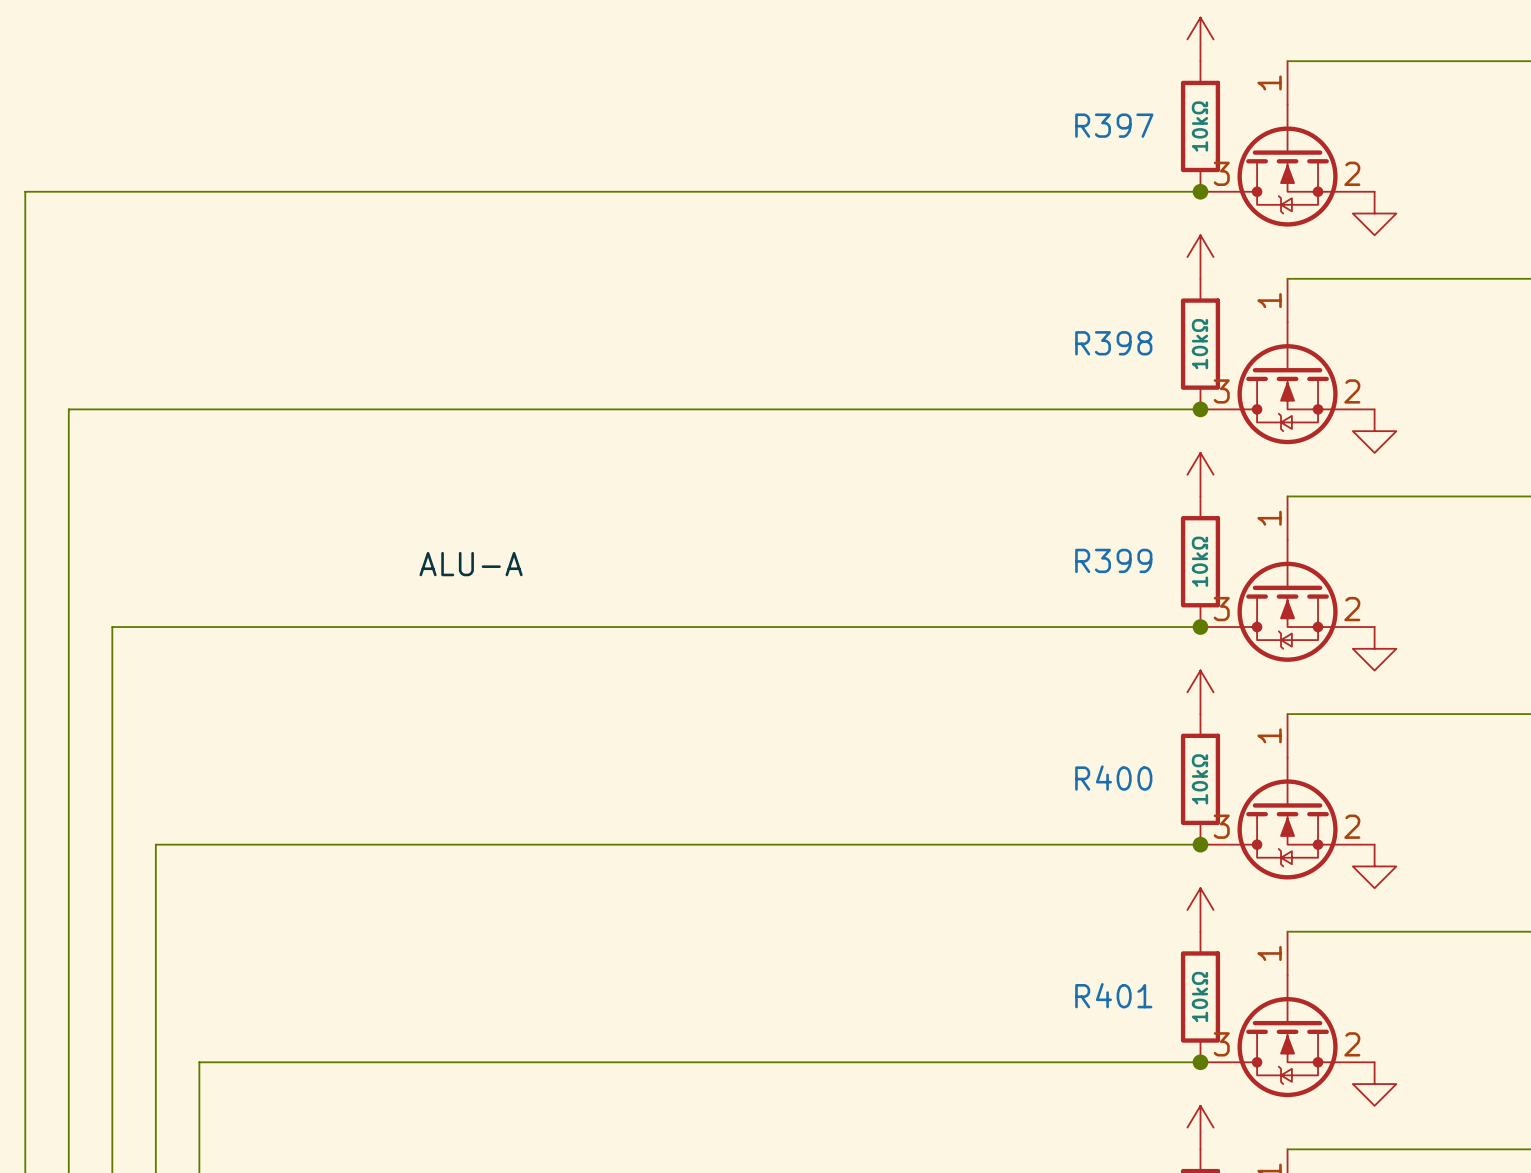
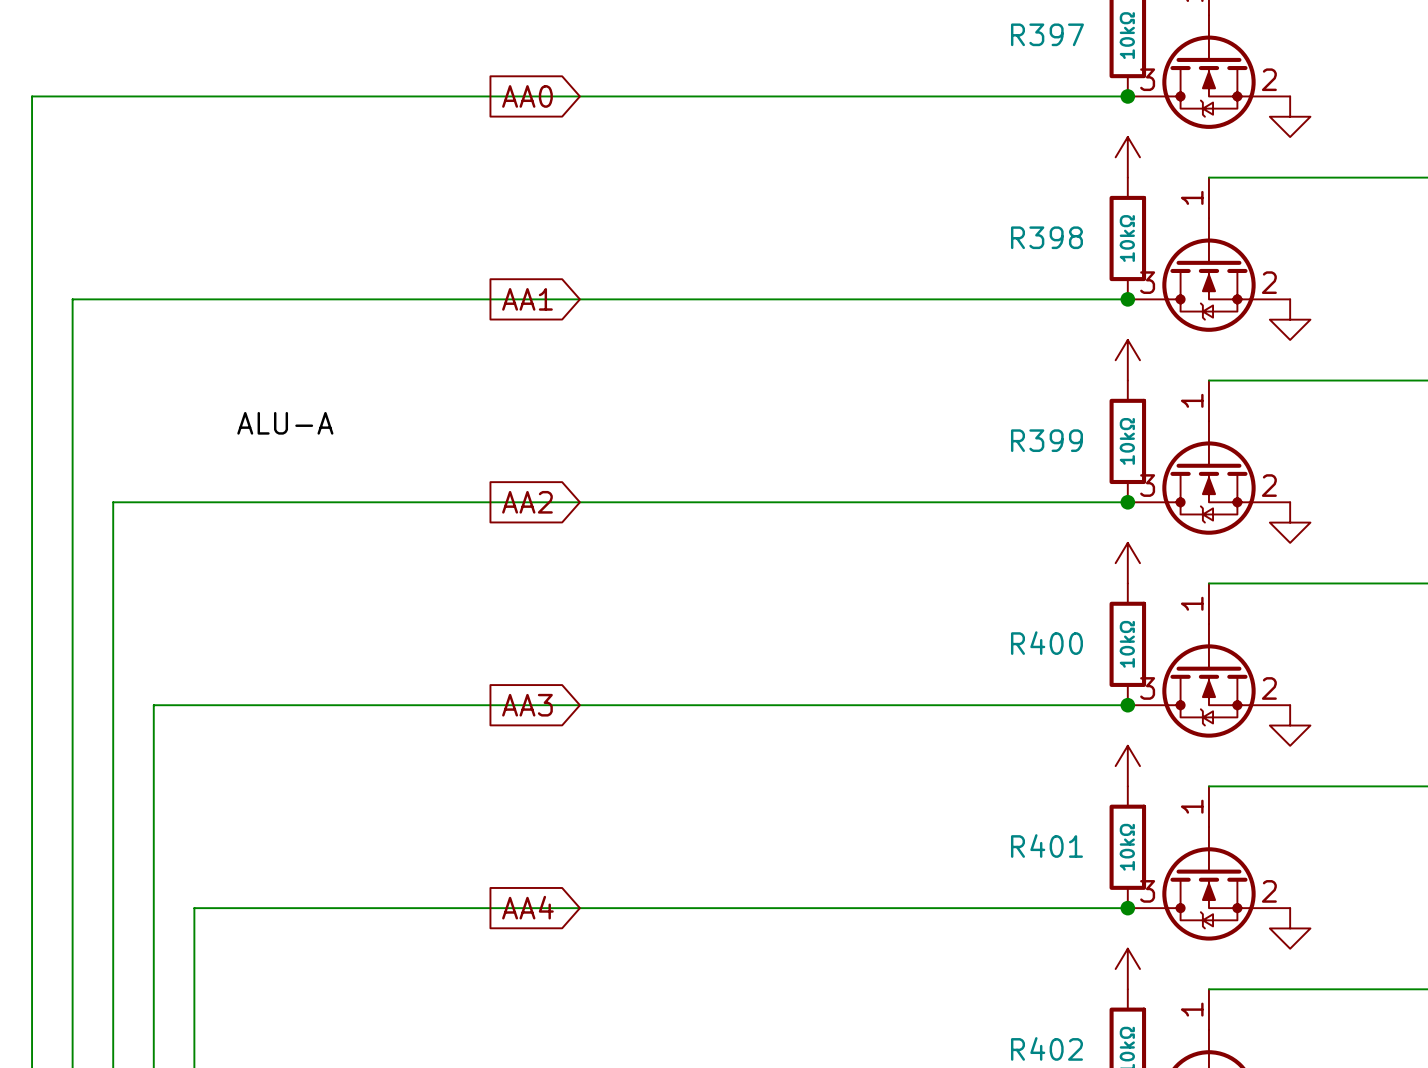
global label: none -> AA0 (527, 96)
global label: none -> AA1 (527, 299)
label position: ALU-A (471, 564) -> ALU-A (285, 423)
global label: none -> AA2 (527, 502)
global label: none -> AA3 (527, 705)
global label: none -> AA4 (527, 907)

